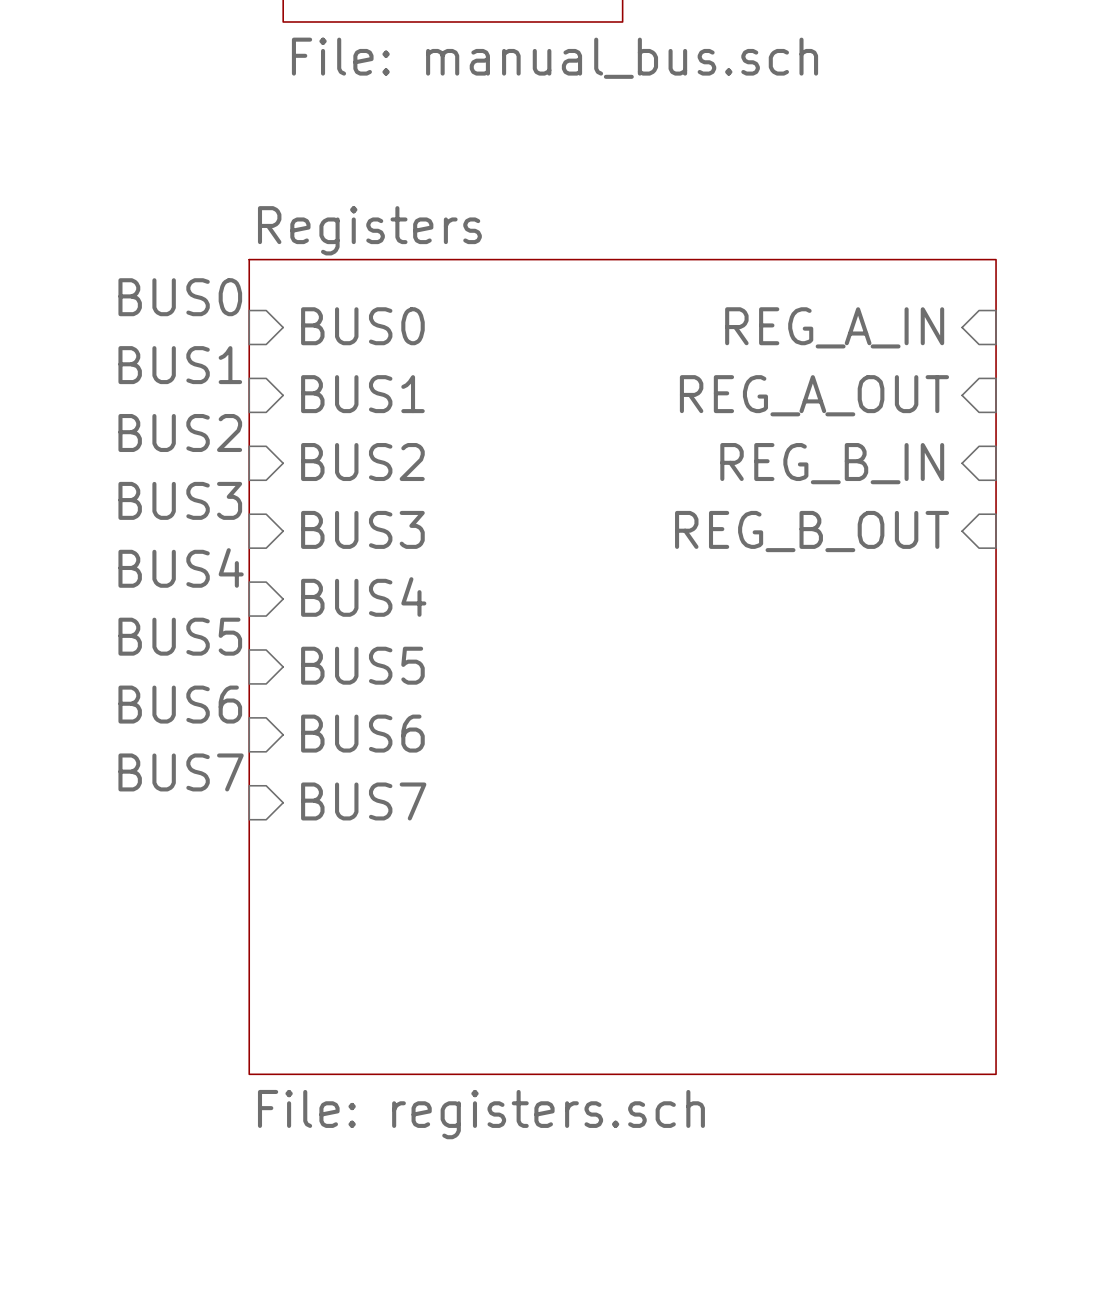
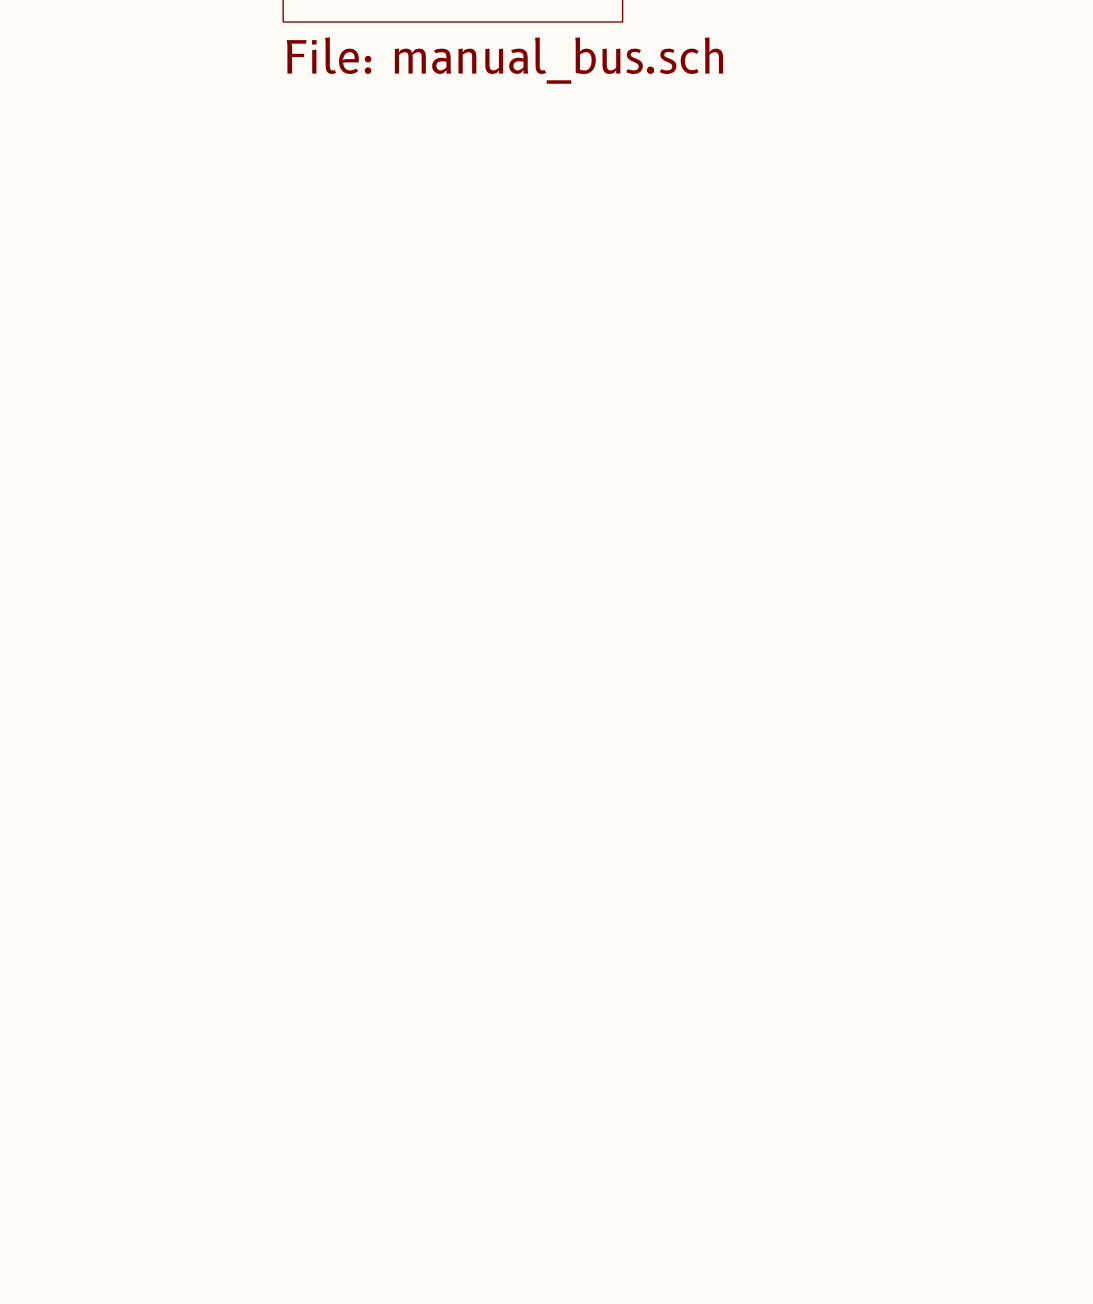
label: BUS0 (180, 297) -> none
sheet pin: BUS0 (362, 326) -> none
sheet pin: REG_A_IN (834, 327) -> none
label: BUS1 (180, 365) -> none
sheet pin: BUS1 (362, 394) -> none
sheet pin: REG_A_OUT (814, 395) -> none
label: BUS2 (180, 432) -> none
sheet pin: BUS2 (362, 462) -> none
sheet pin: REG_B_IN (832, 463) -> none
label: BUS3 (180, 500) -> none
sheet pin: BUS3 (362, 529) -> none
sheet pin: REG_B_OUT (812, 531) -> none
label: BUS4 (181, 567) -> none
sheet pin: BUS4 (363, 596) -> none
label: BUS5 (180, 636) -> none
sheet pin: BUS5 (362, 665) -> none
sheet Registers: File: registers.sch (622, 666) -> none
label: BUS6 (180, 704) -> none
sheet pin: BUS6 (362, 733) -> none
label: BUS7 (181, 772) -> none
sheet pin: BUS7 (363, 801) -> none

